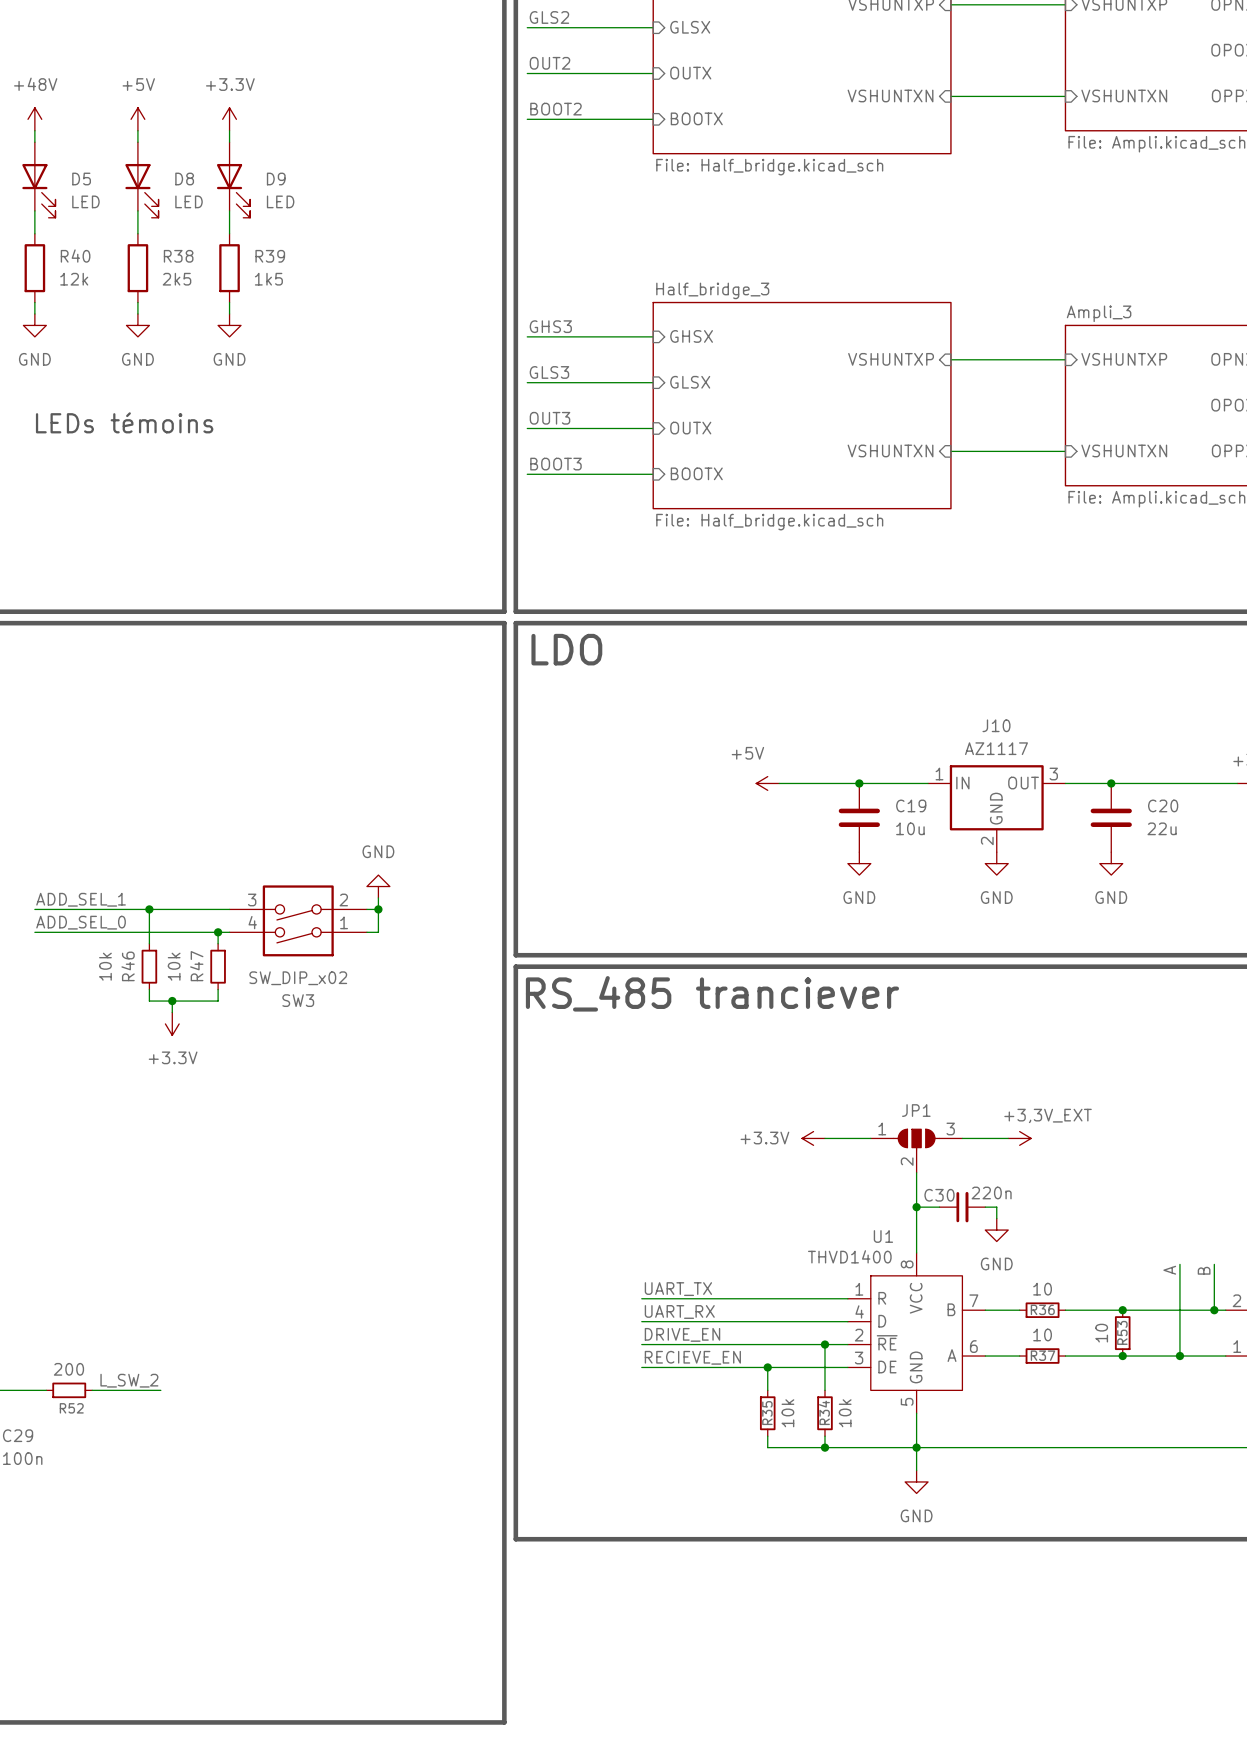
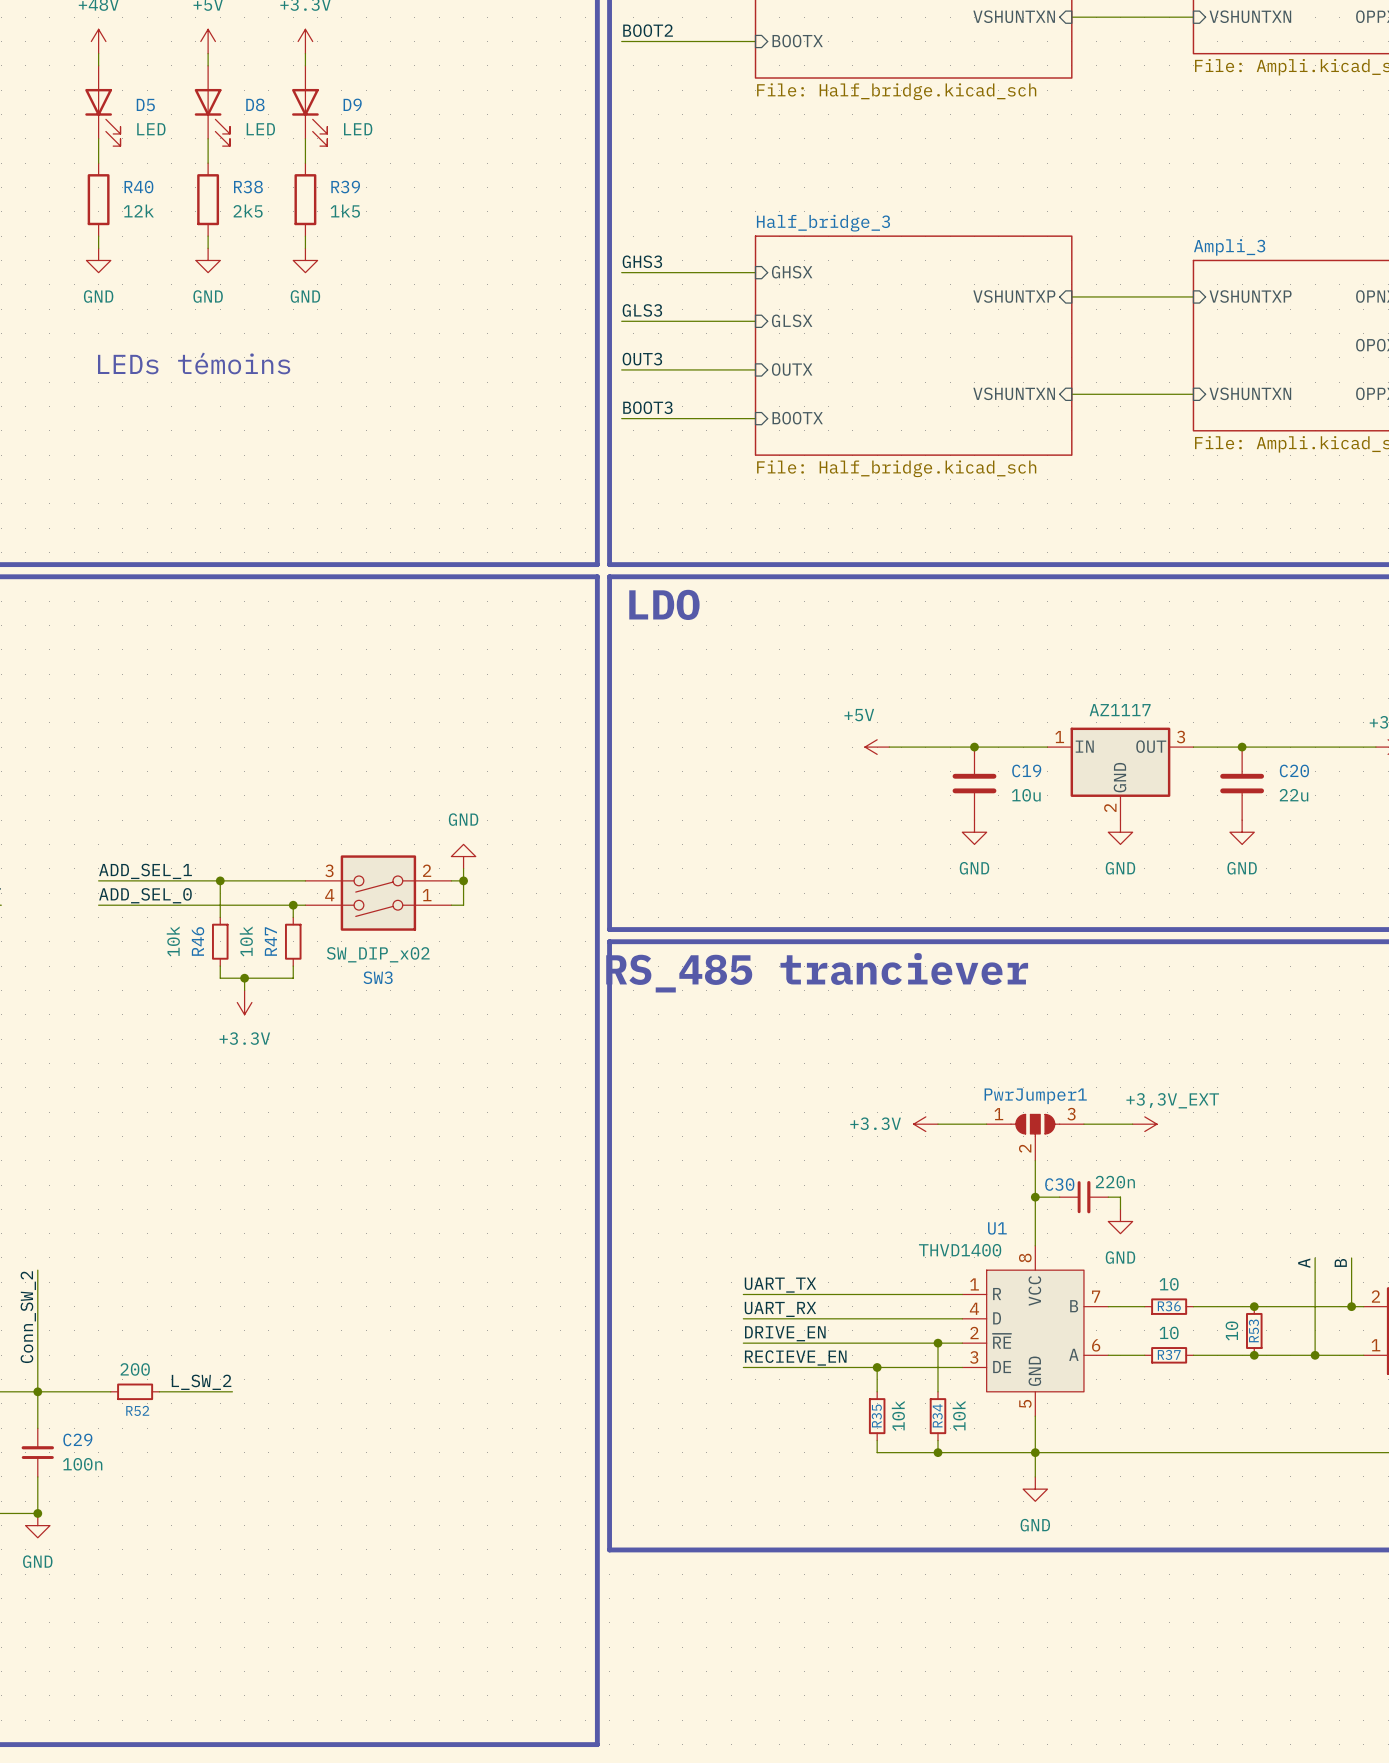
J10 name: J10 (996, 725) -> none
JP1 name: JP1 (916, 1110) -> PwrJumper1 (1035, 1096)

